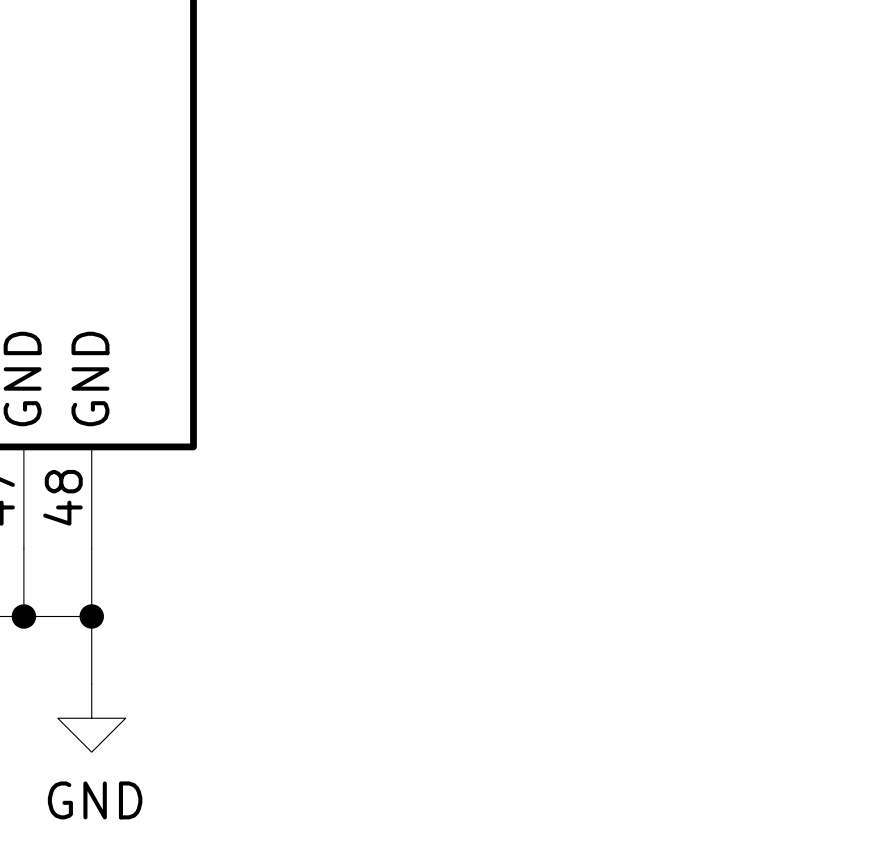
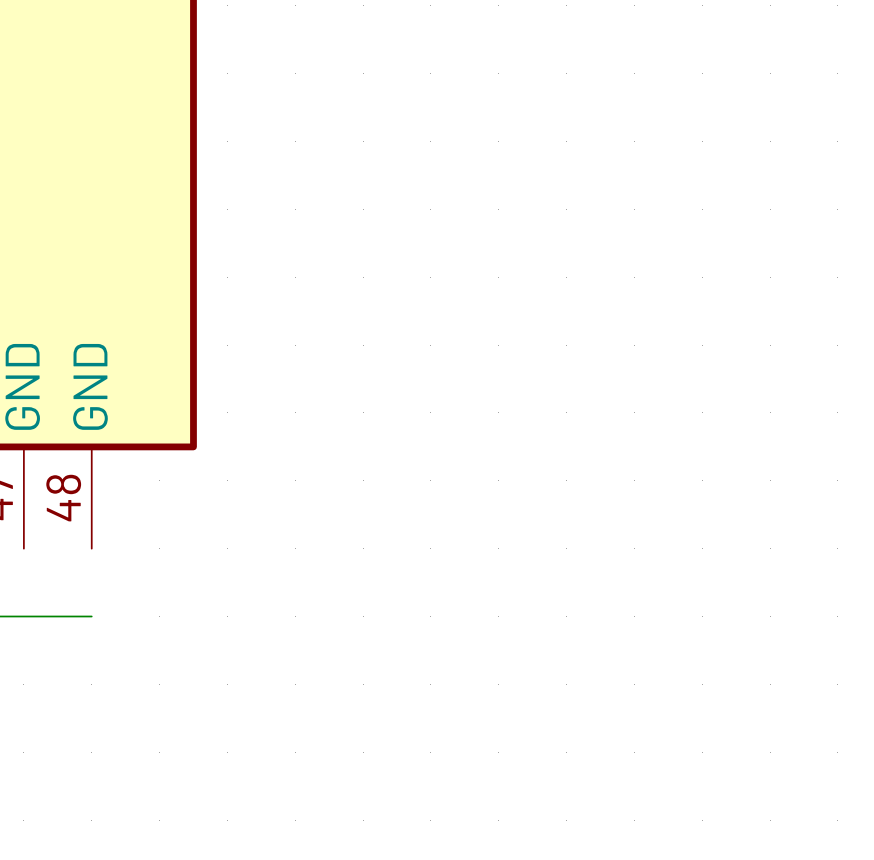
wire: (23, 548) (23, 616) -> none
wire: (91, 548) (91, 684) -> none
junction: (23, 616) -> none
junction: (91, 616) -> none
power symbol: GND (91, 718) -> none

